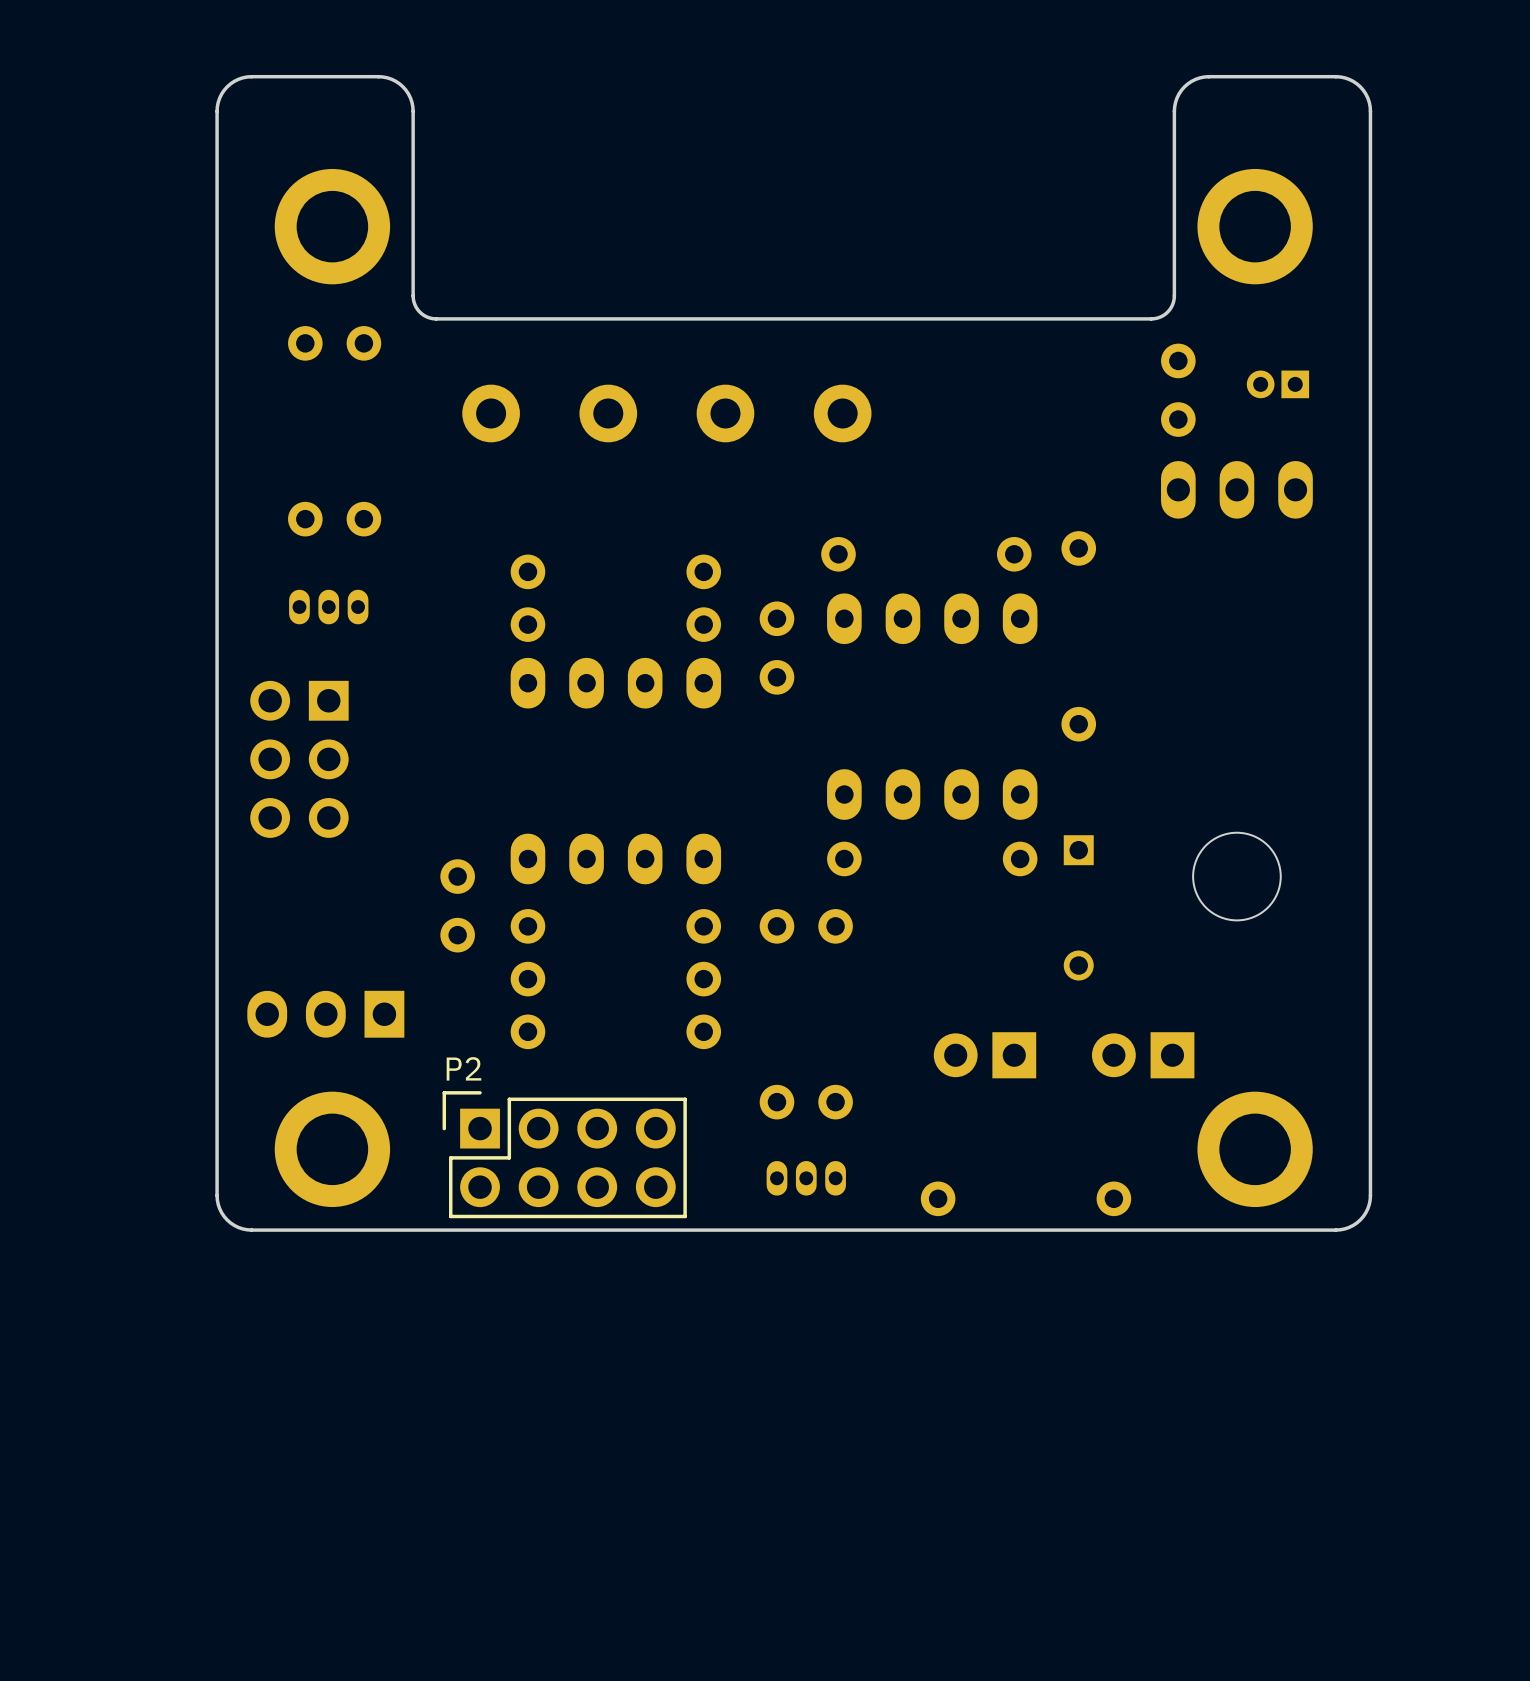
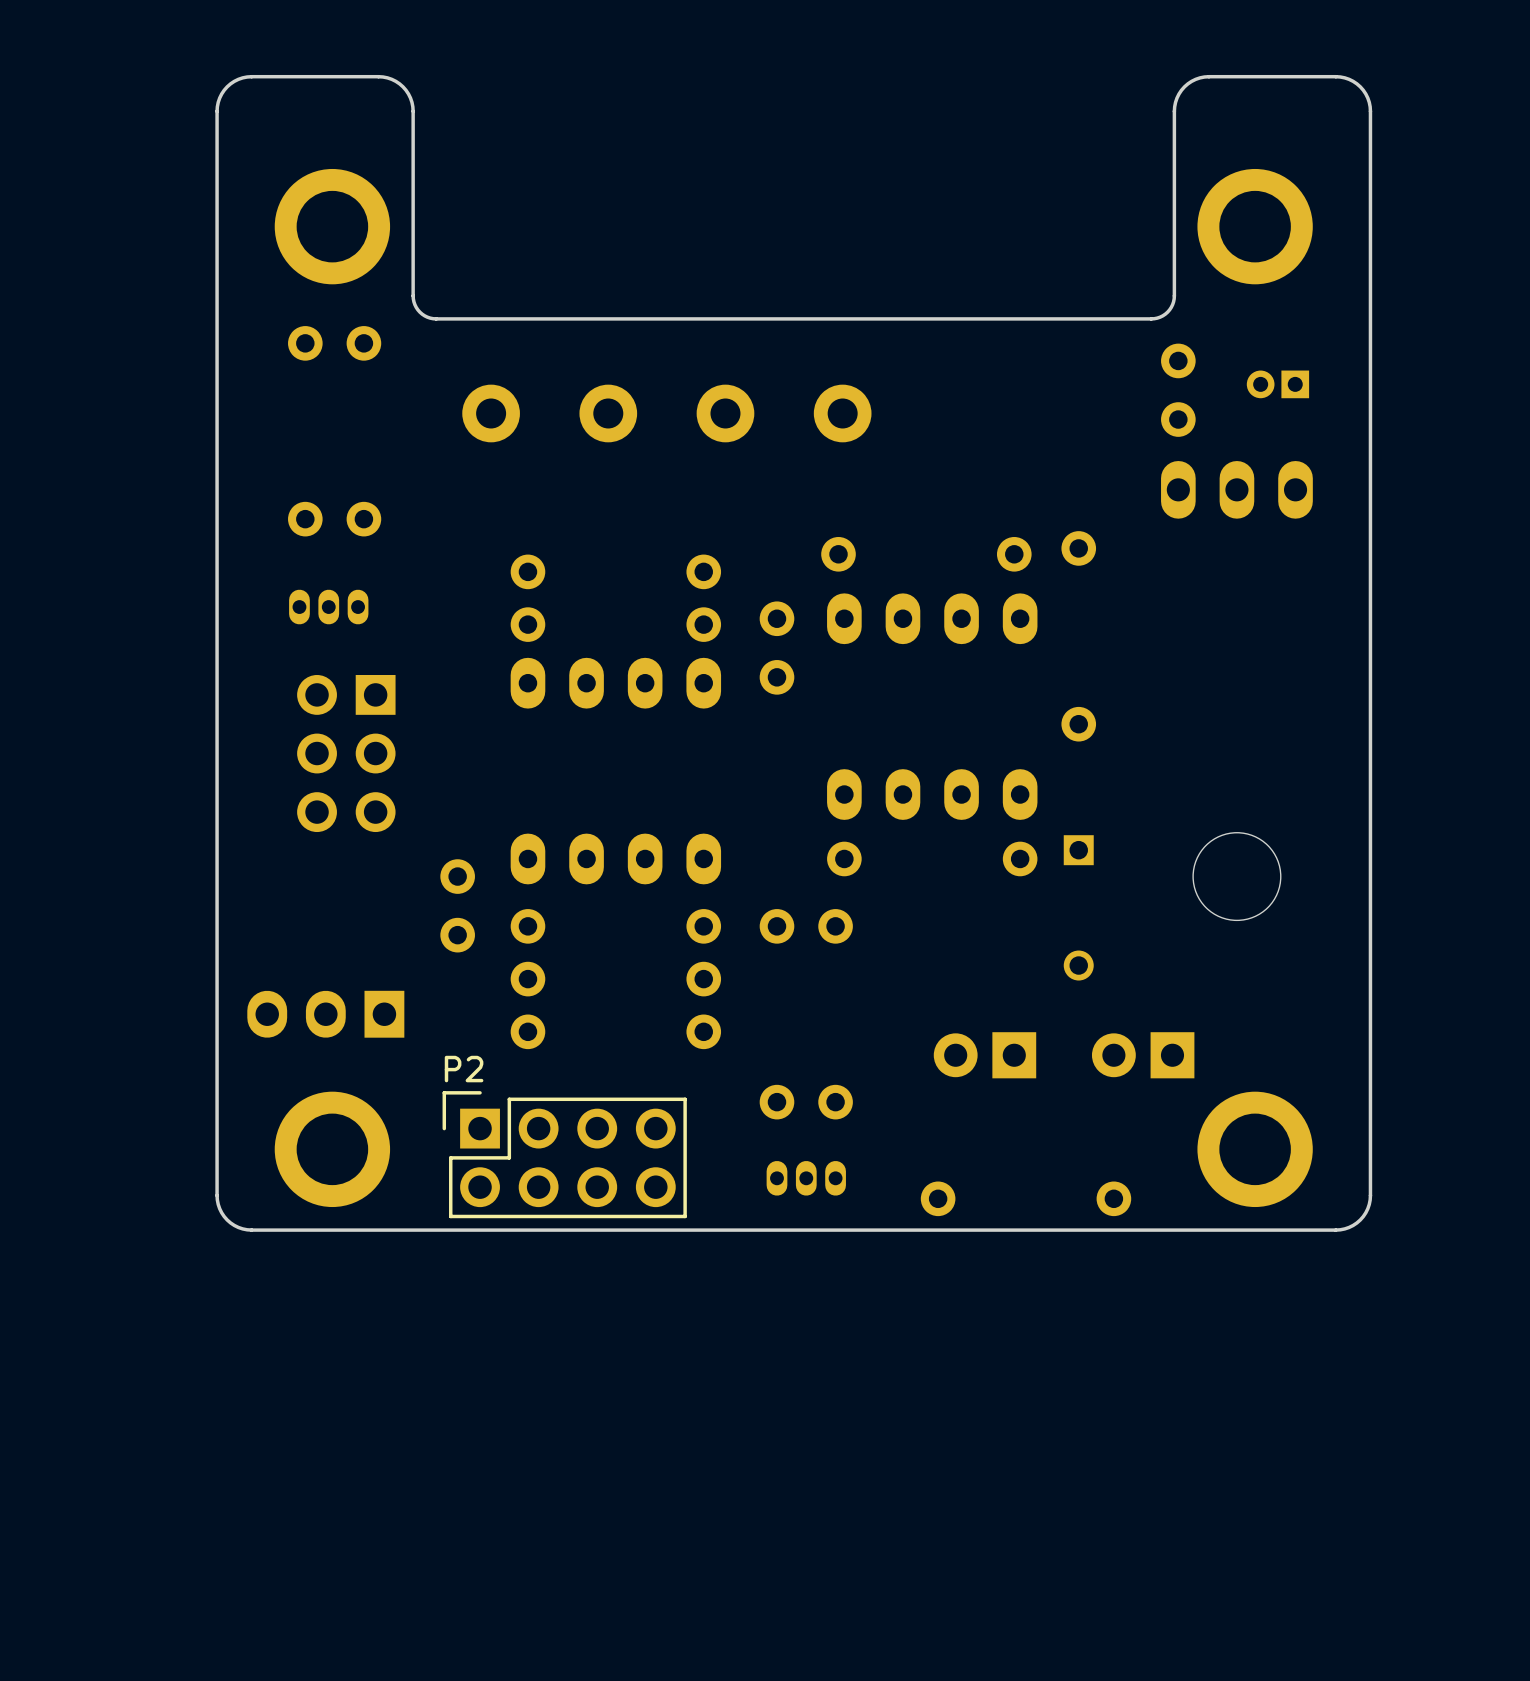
part position: (299, 759) -> (346, 753)

